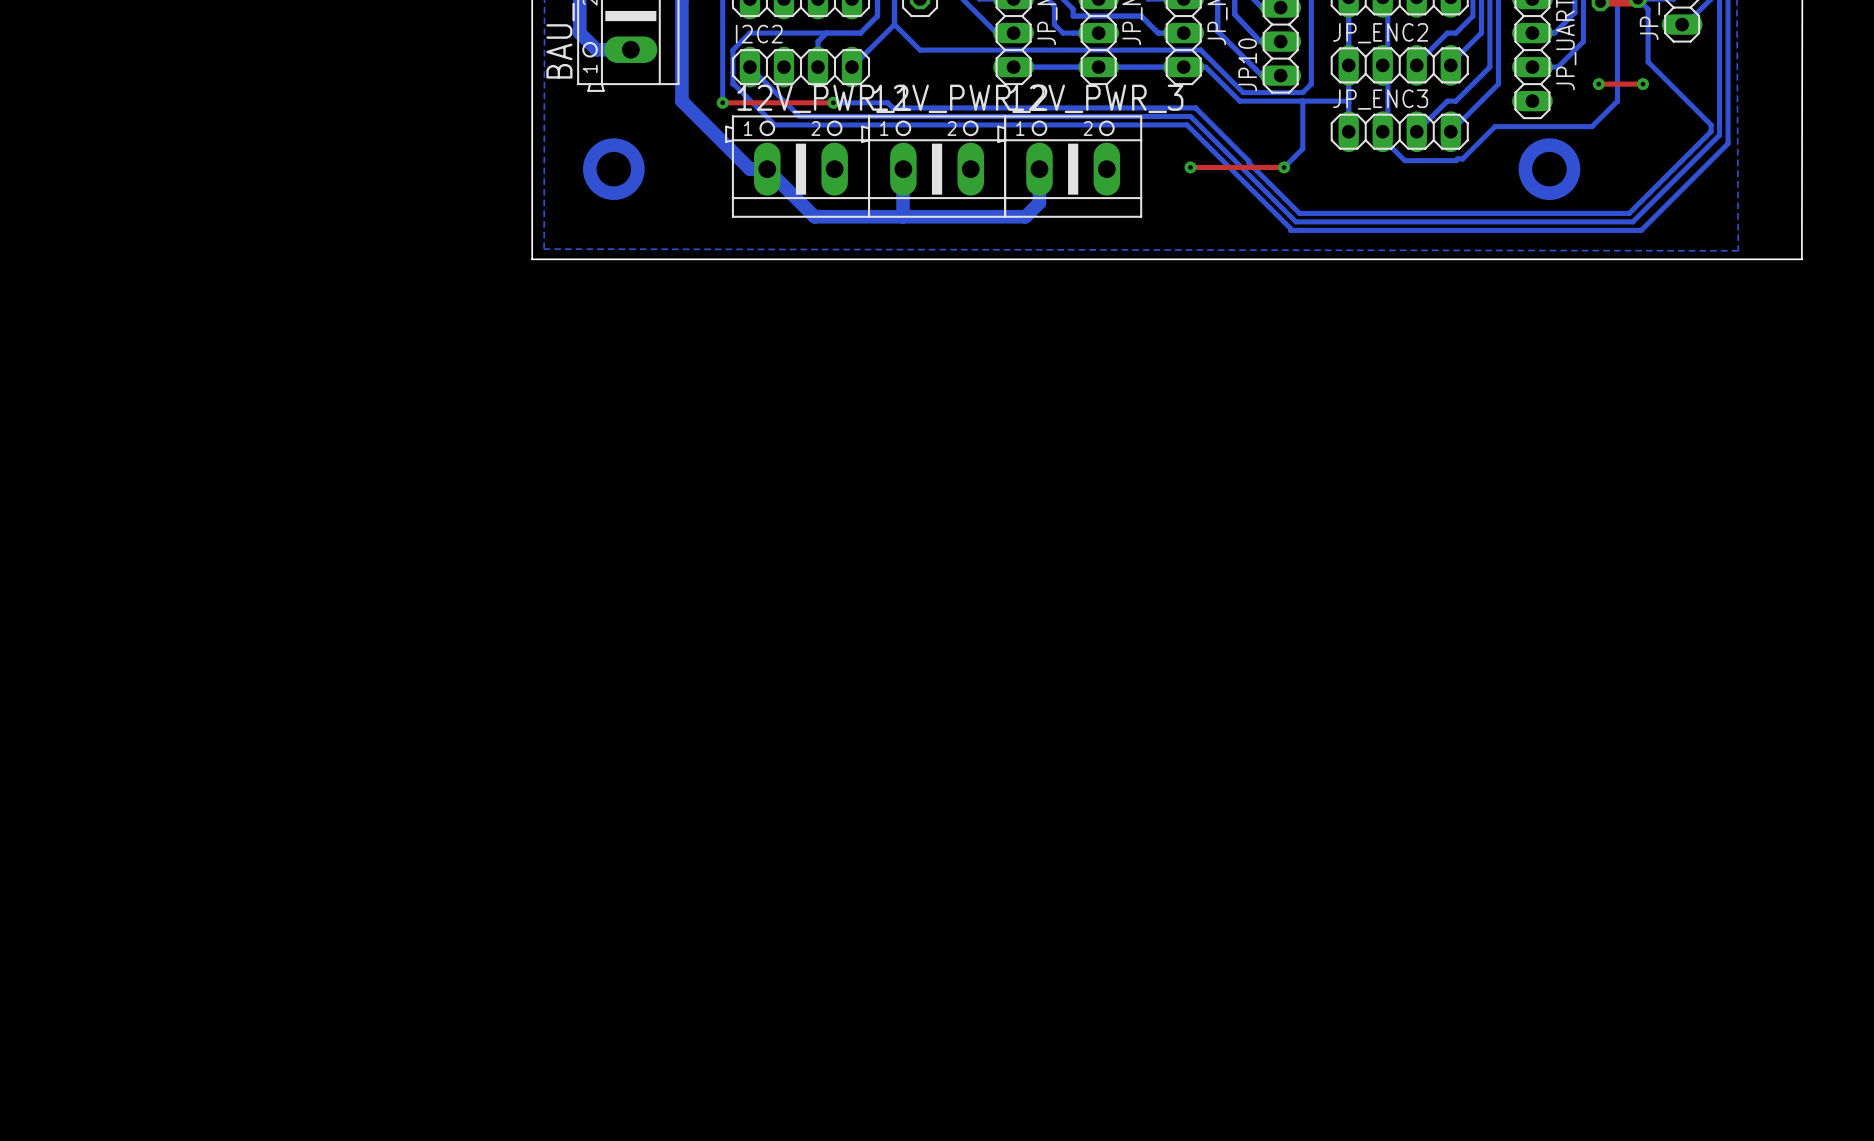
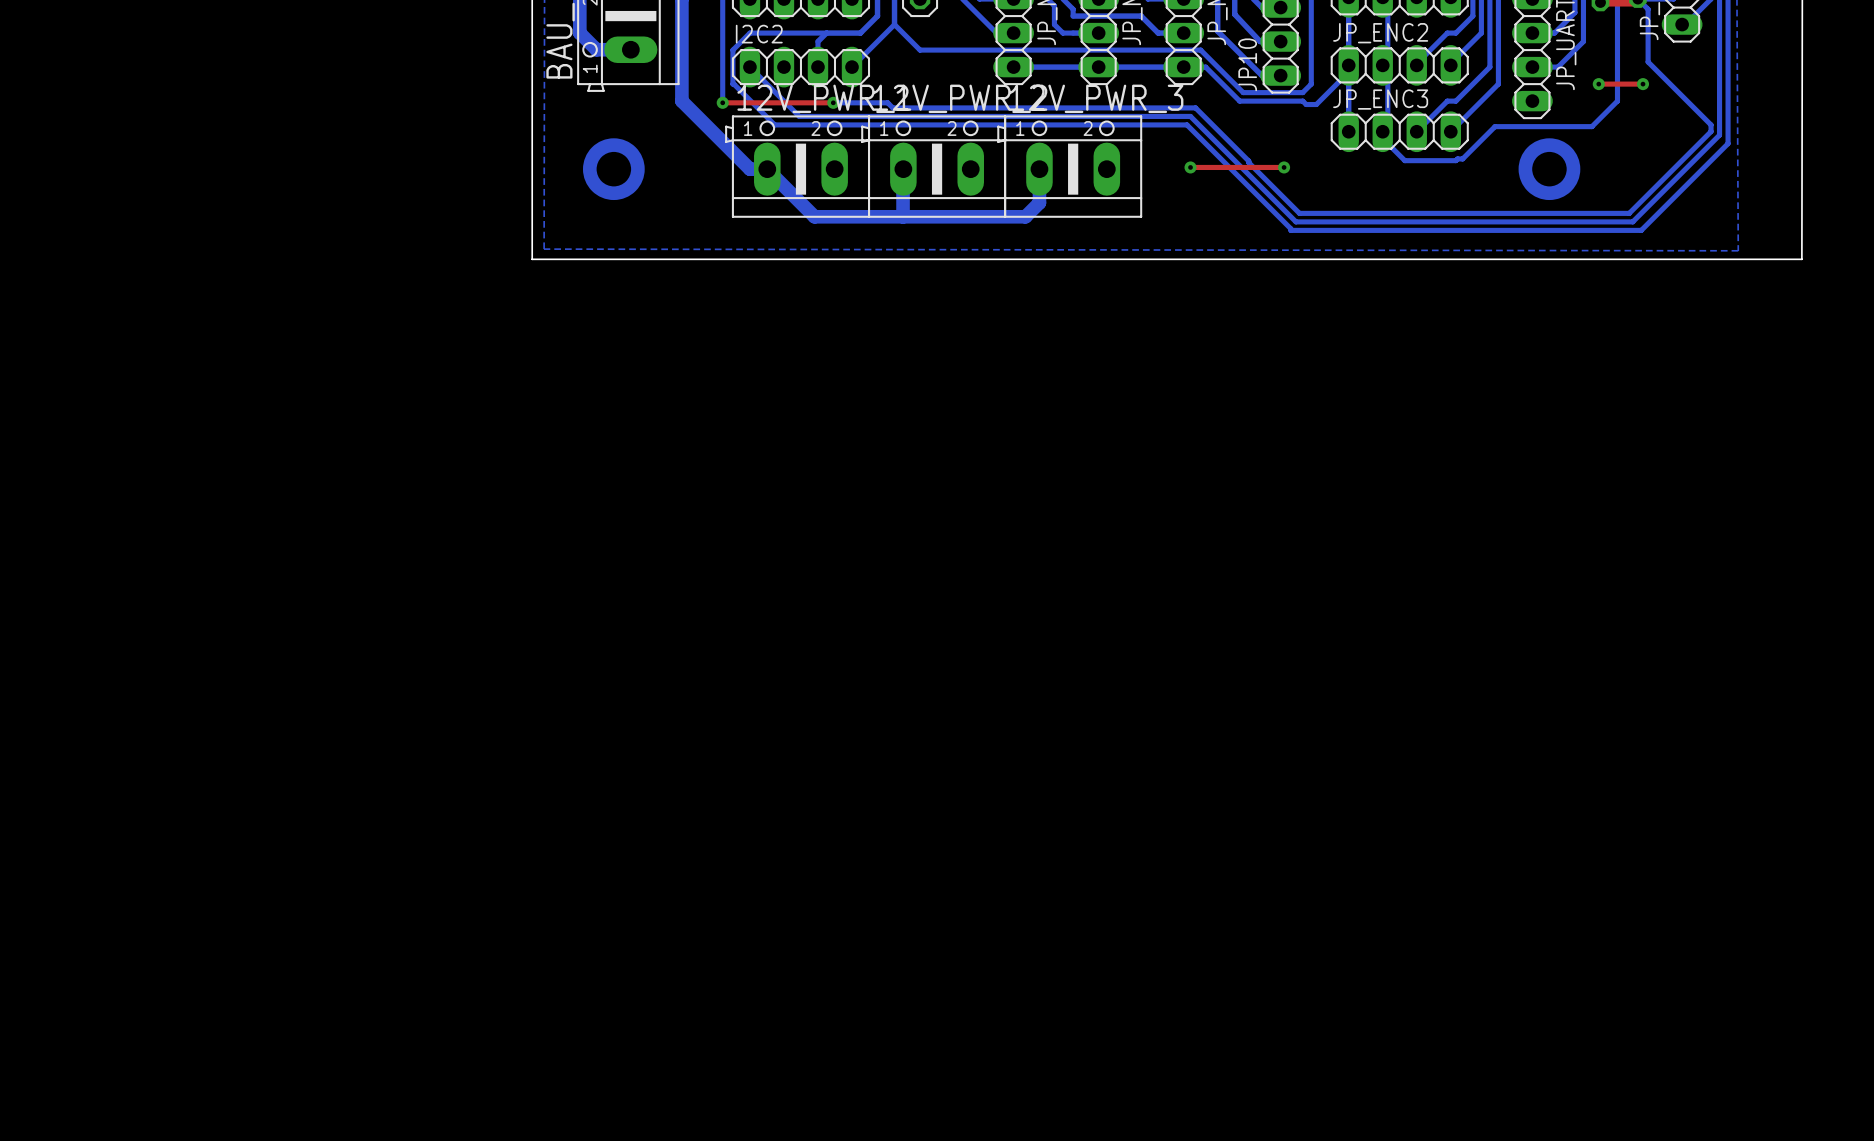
bottom track: none -> (1348, 72) (1316, 104) (1306, 104) (1302, 101)
bottom track: (1348, 102) (1347, 101) (1302, 101) (1302, 148) (1284, 167) -> none

